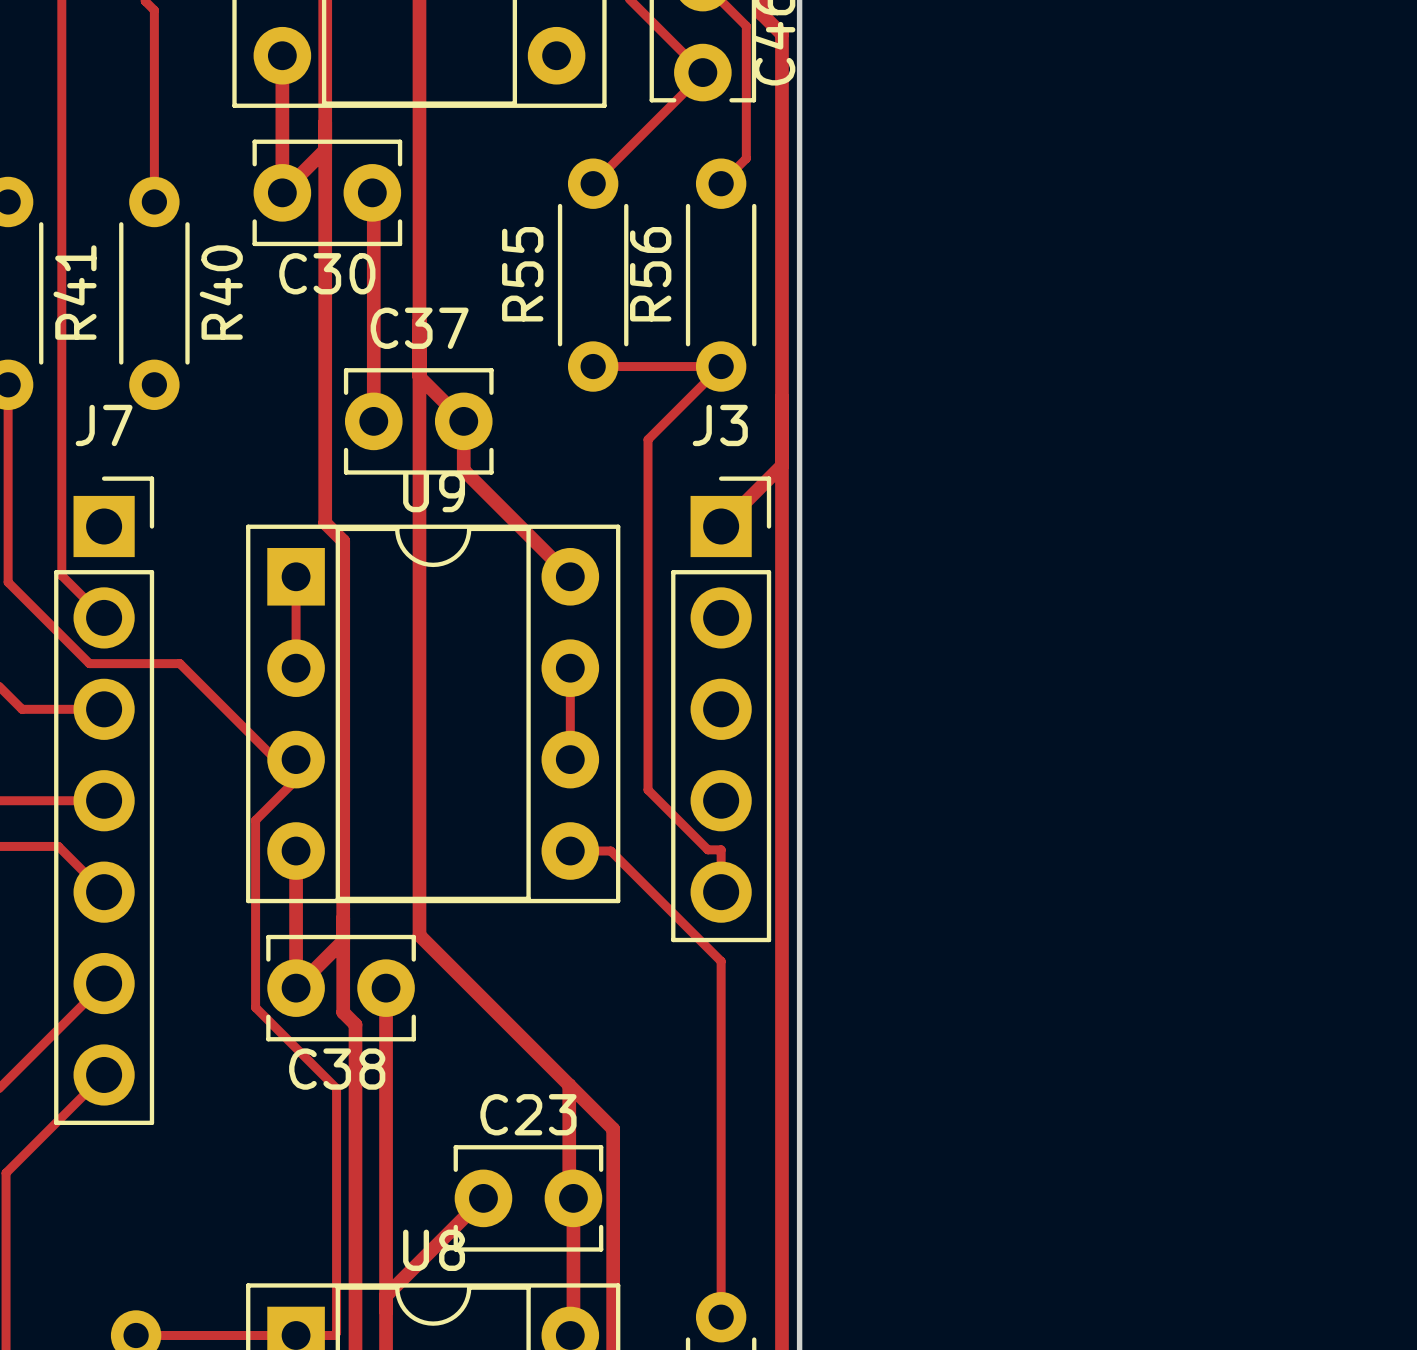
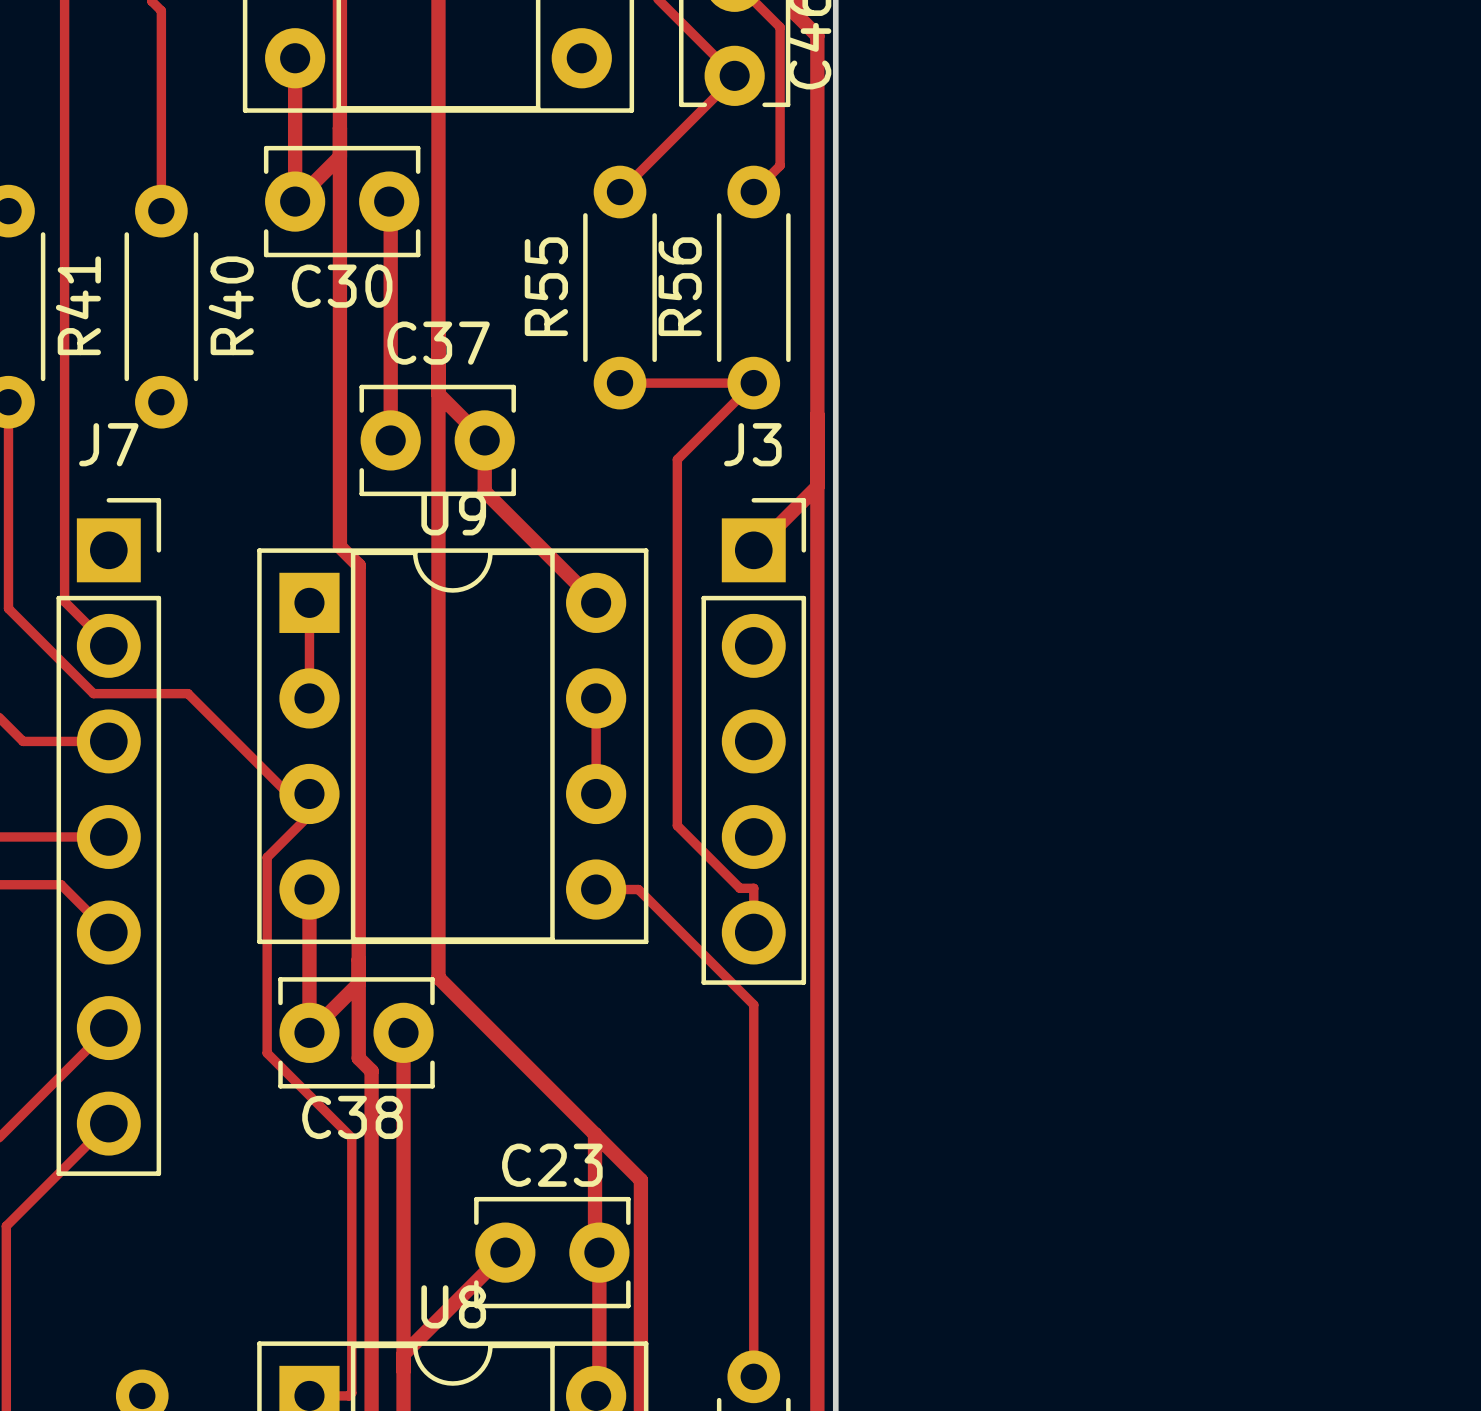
track: (136, 1335) (296, 1335) -> none

